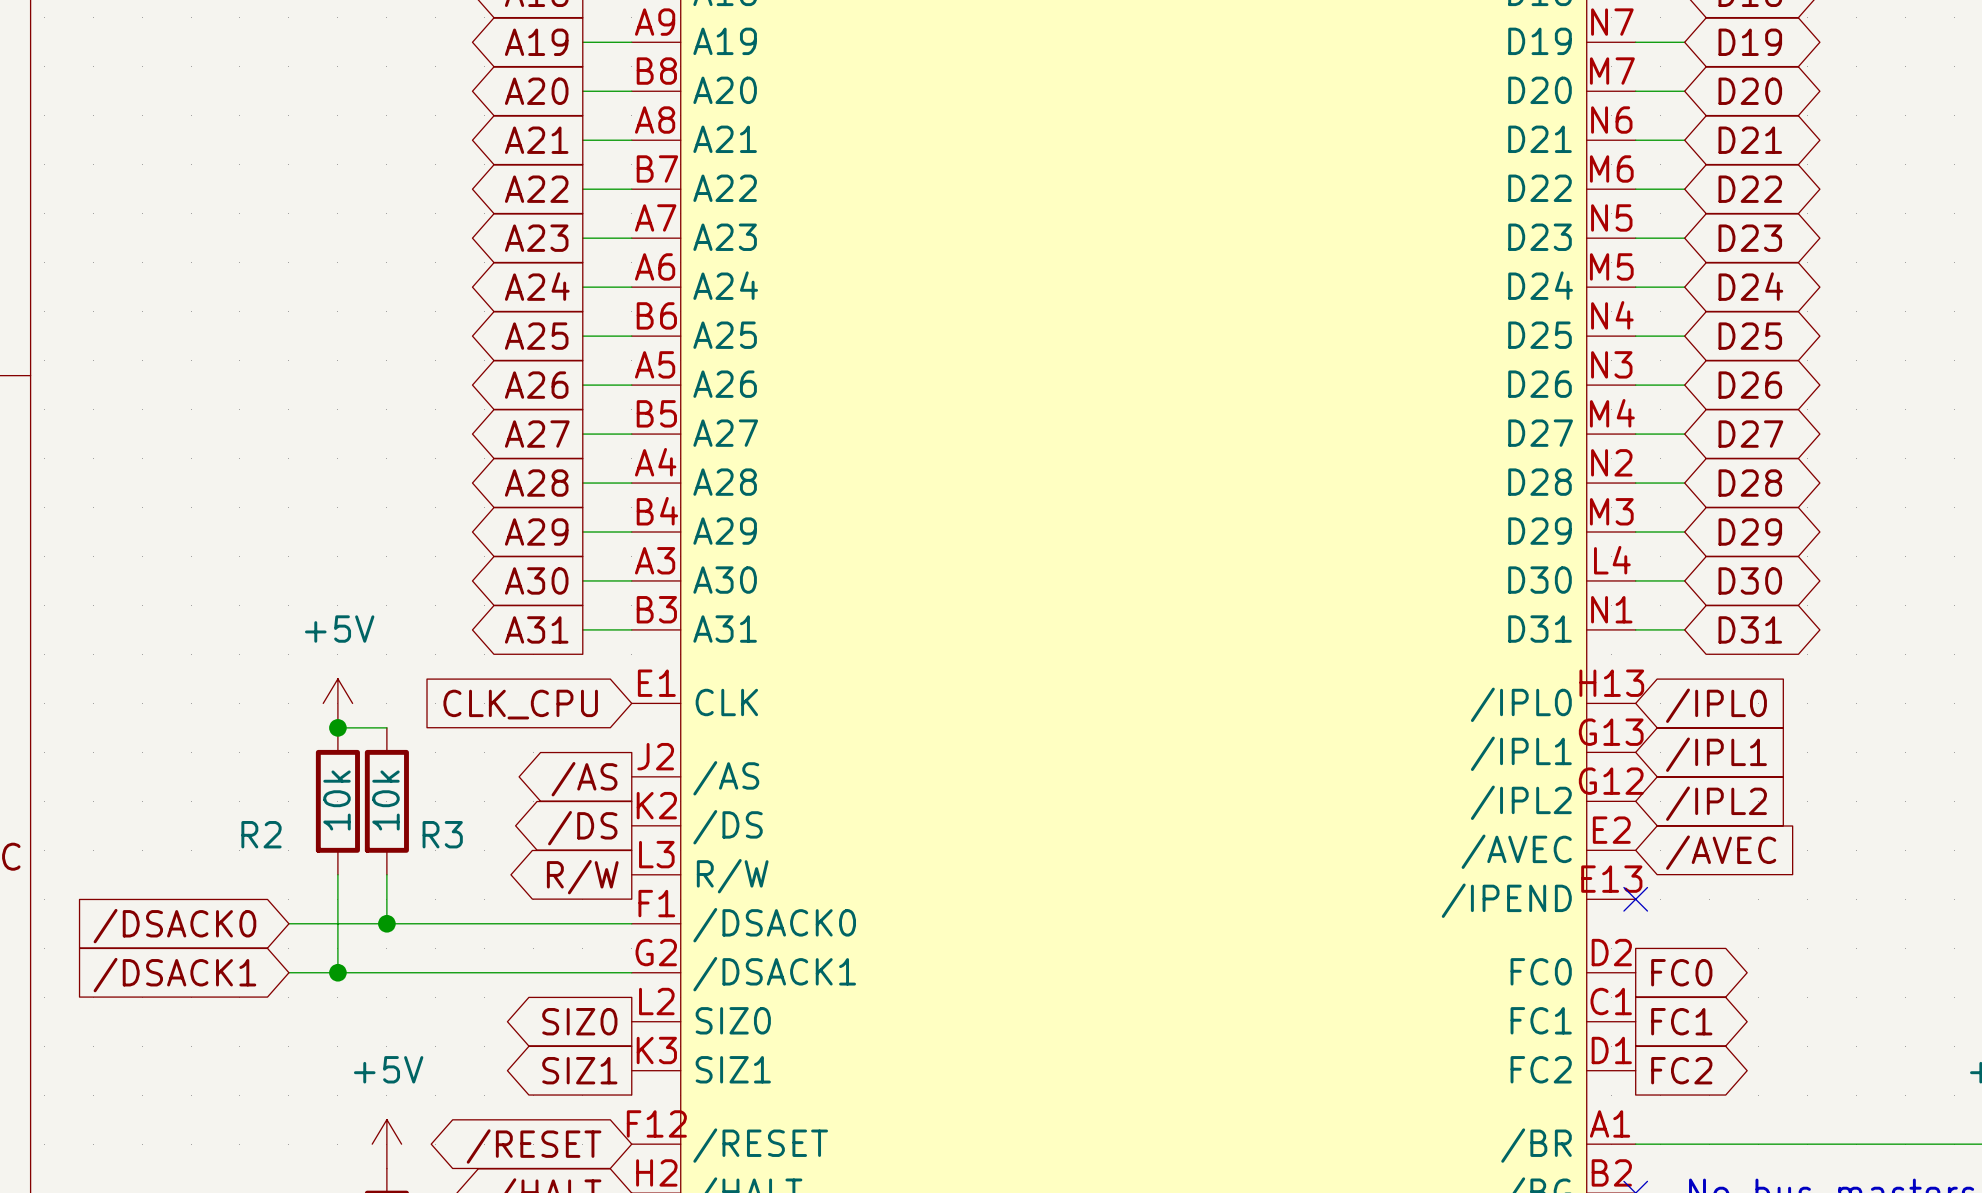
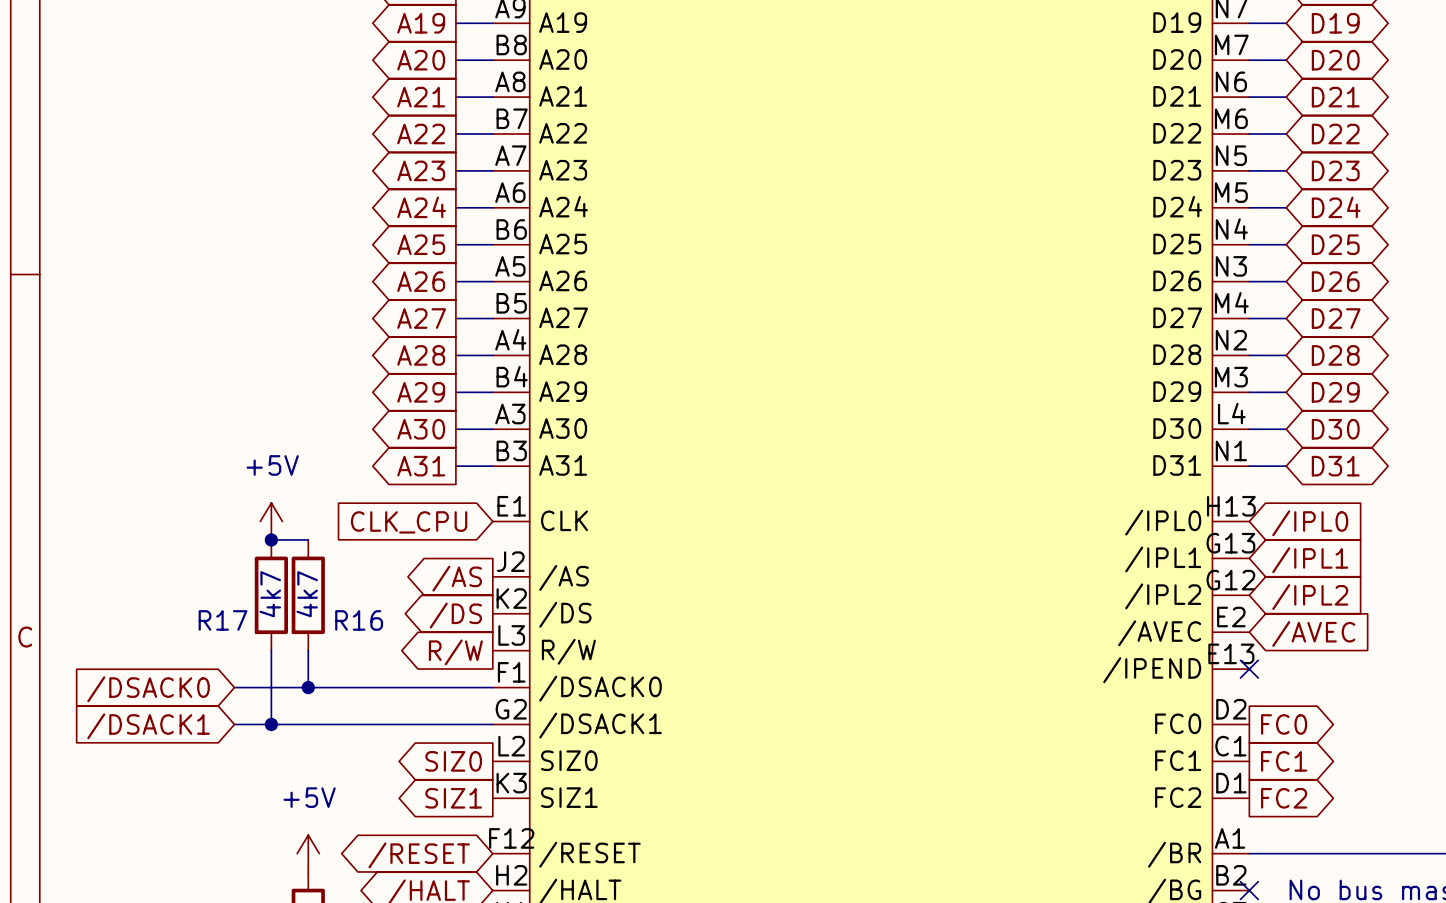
R2 value: 10k (337, 800) -> 4k7 (270, 594)
R3 value: 10k (385, 800) -> 4k7 (307, 594)
R2 name: R2 (261, 834) -> R17 (223, 620)
R3 name: R3 (442, 834) -> R16 (359, 620)

